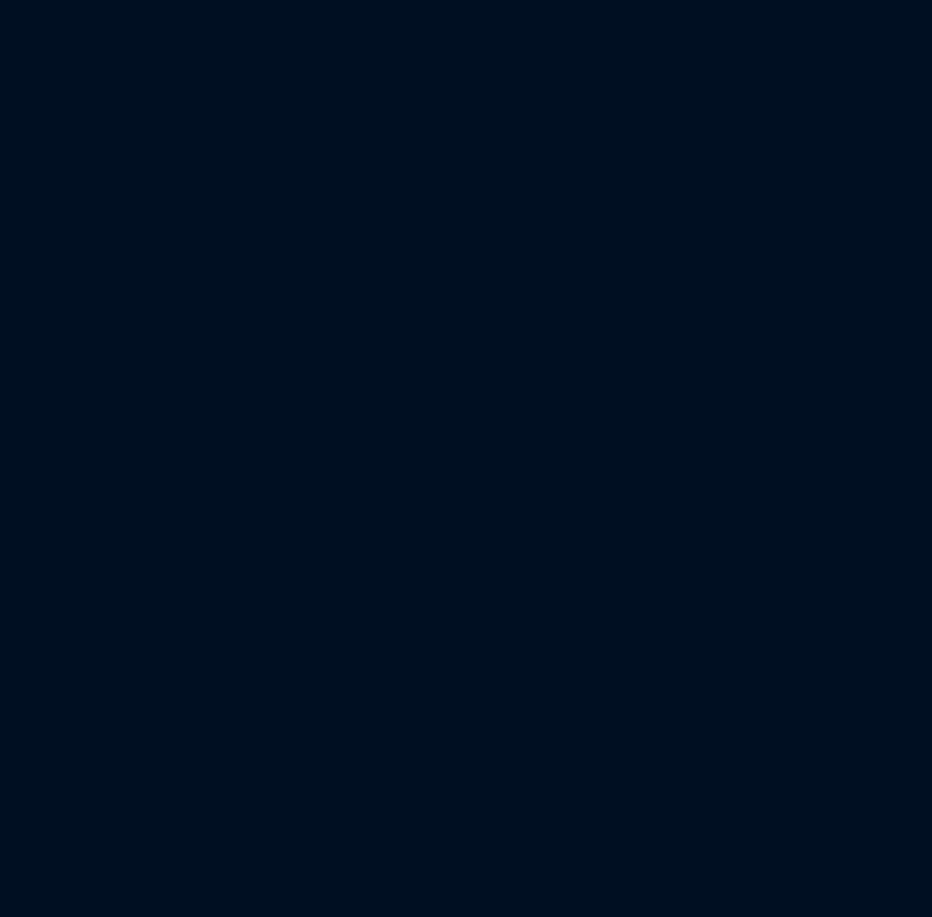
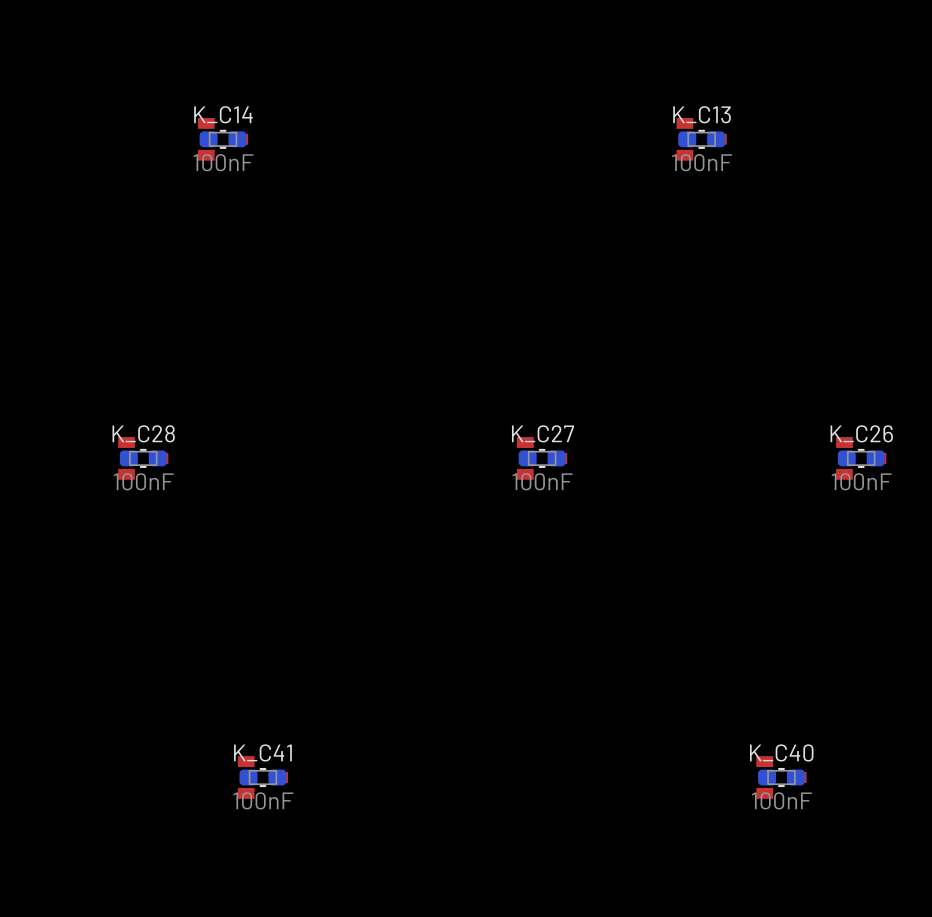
part: none -> (223, 139)
K_C14: none -> 100nF (223, 139)
part: none -> (701, 139)
K_C13: none -> 100nF (701, 139)
part: none -> (143, 458)
K_C28: none -> 100nF (143, 458)
part: none -> (542, 458)
K_C27: none -> 100nF (542, 458)
part: none -> (861, 458)
K_C26: none -> 100nF (861, 458)
part: none -> (262, 777)
K_C41: none -> 100nF (262, 777)
part: none -> (781, 777)
K_C40: none -> 100nF (781, 777)

